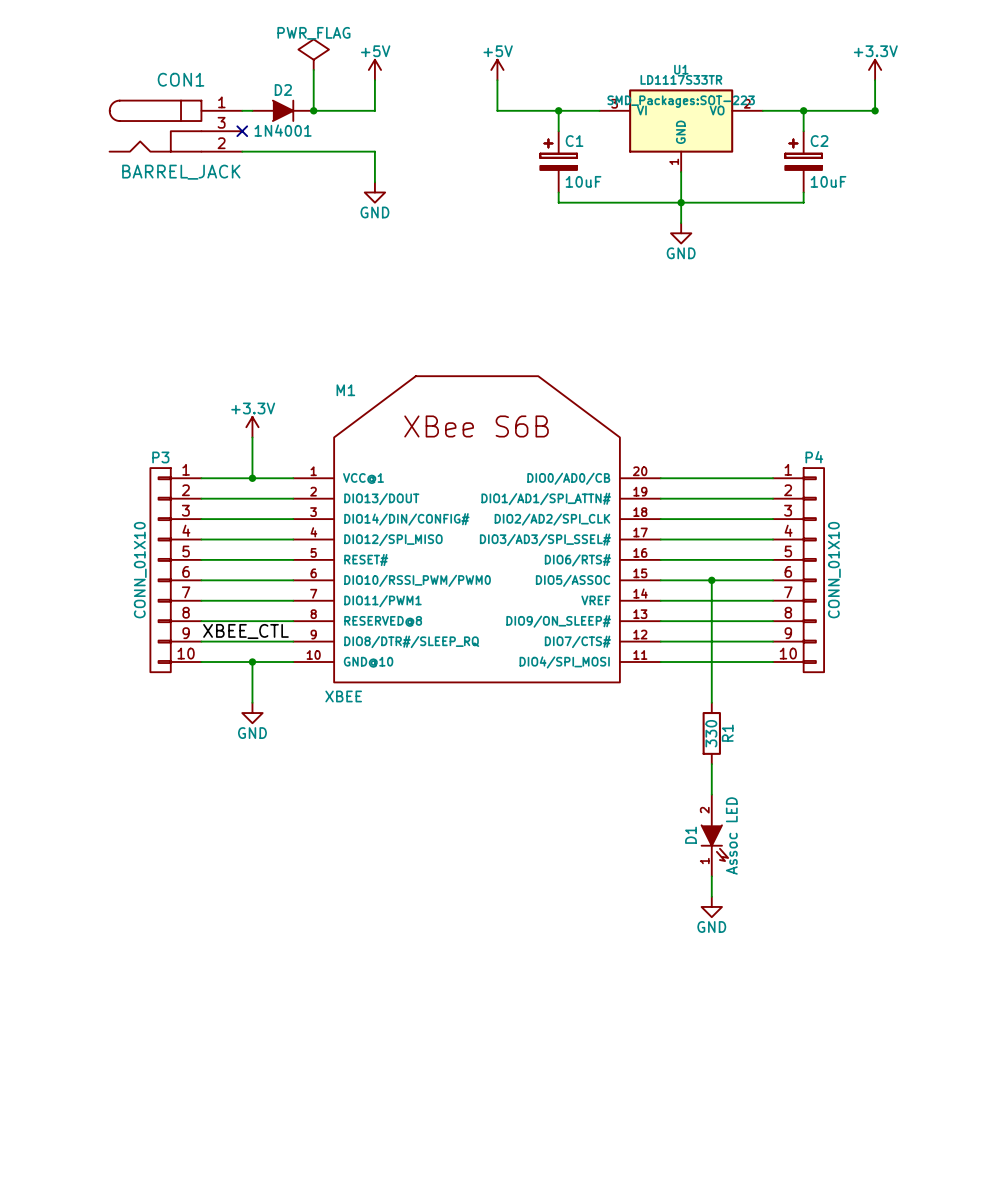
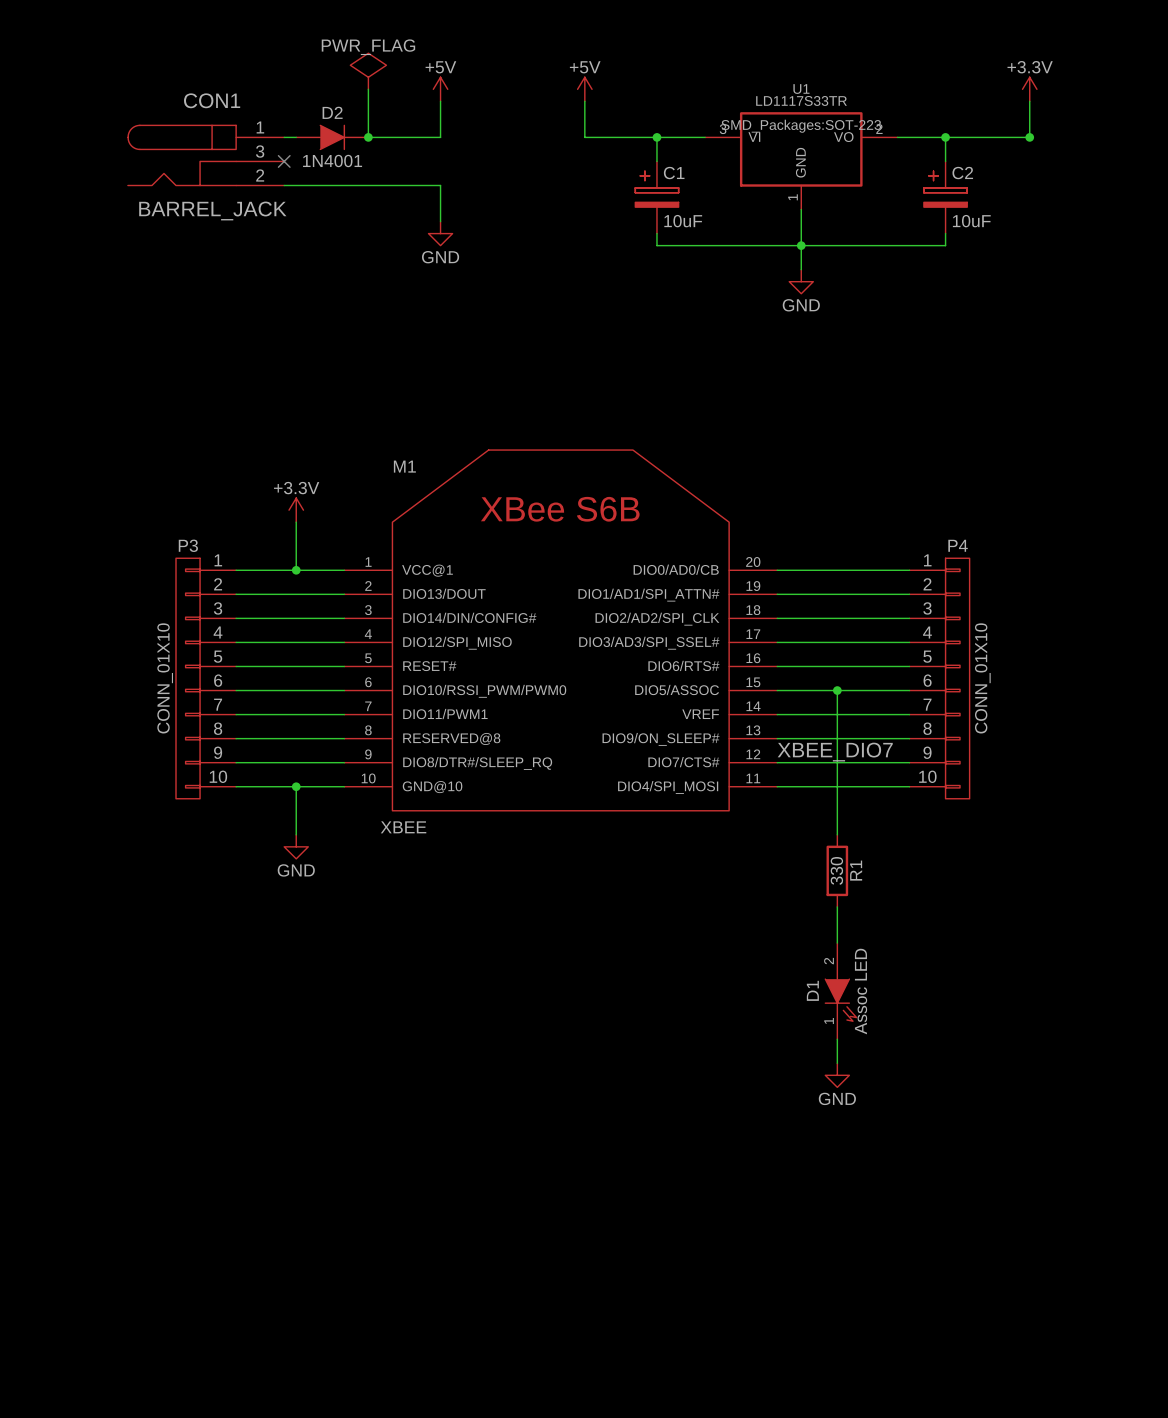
label: XBEE_CTL (245, 631) -> none
label: none -> XBEE_DIO7 (835, 752)

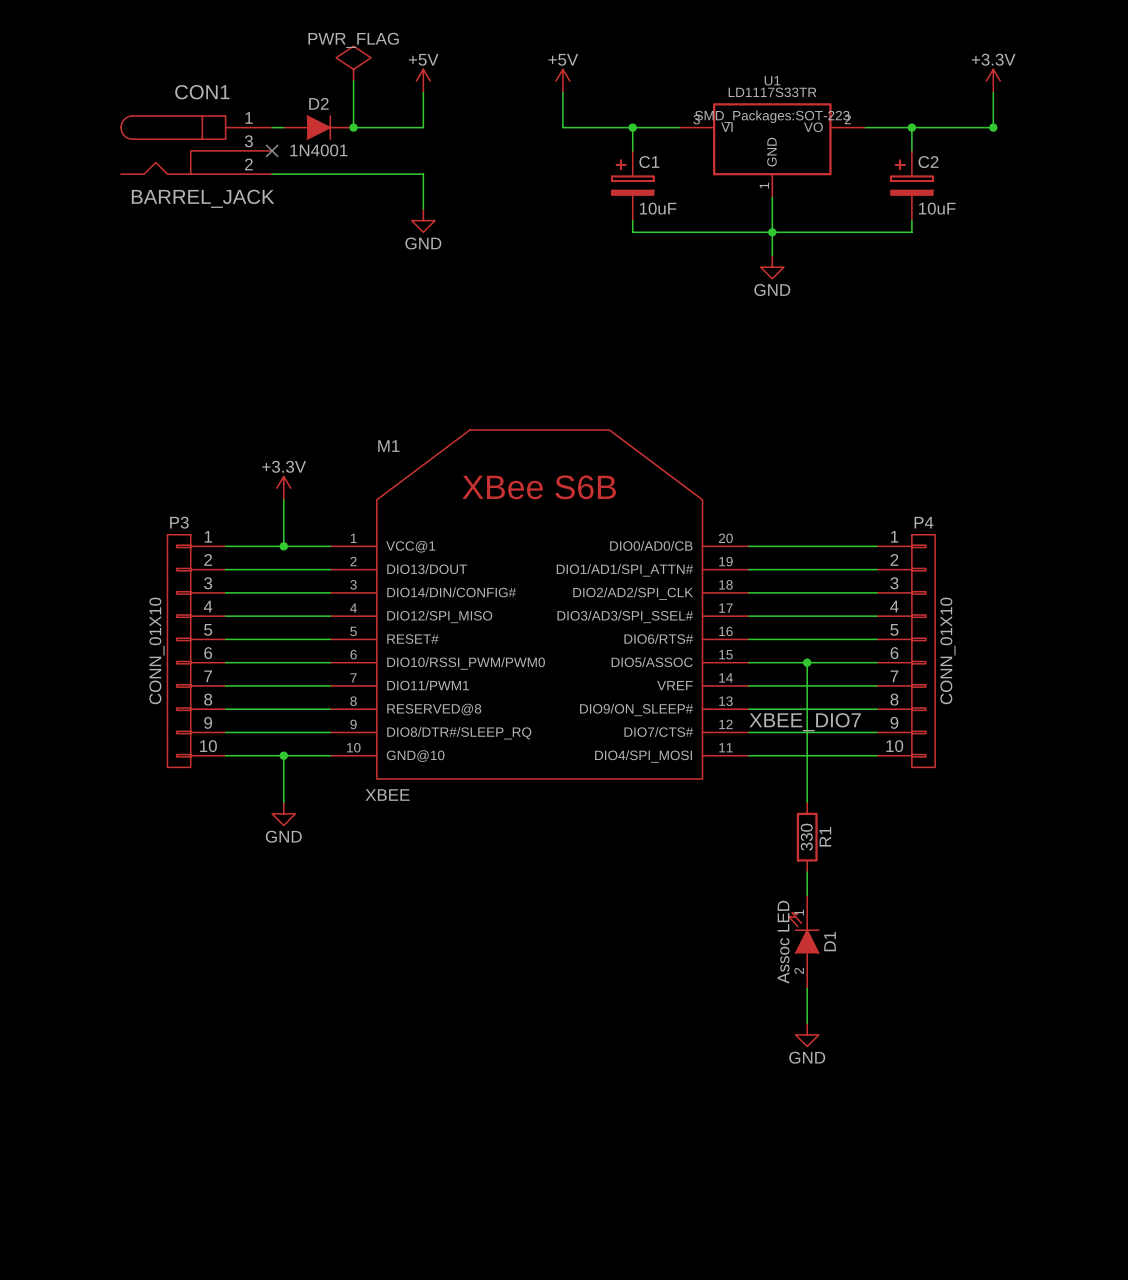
D1 rotation: 0° (840, 1000) -> 180° (803, 933)

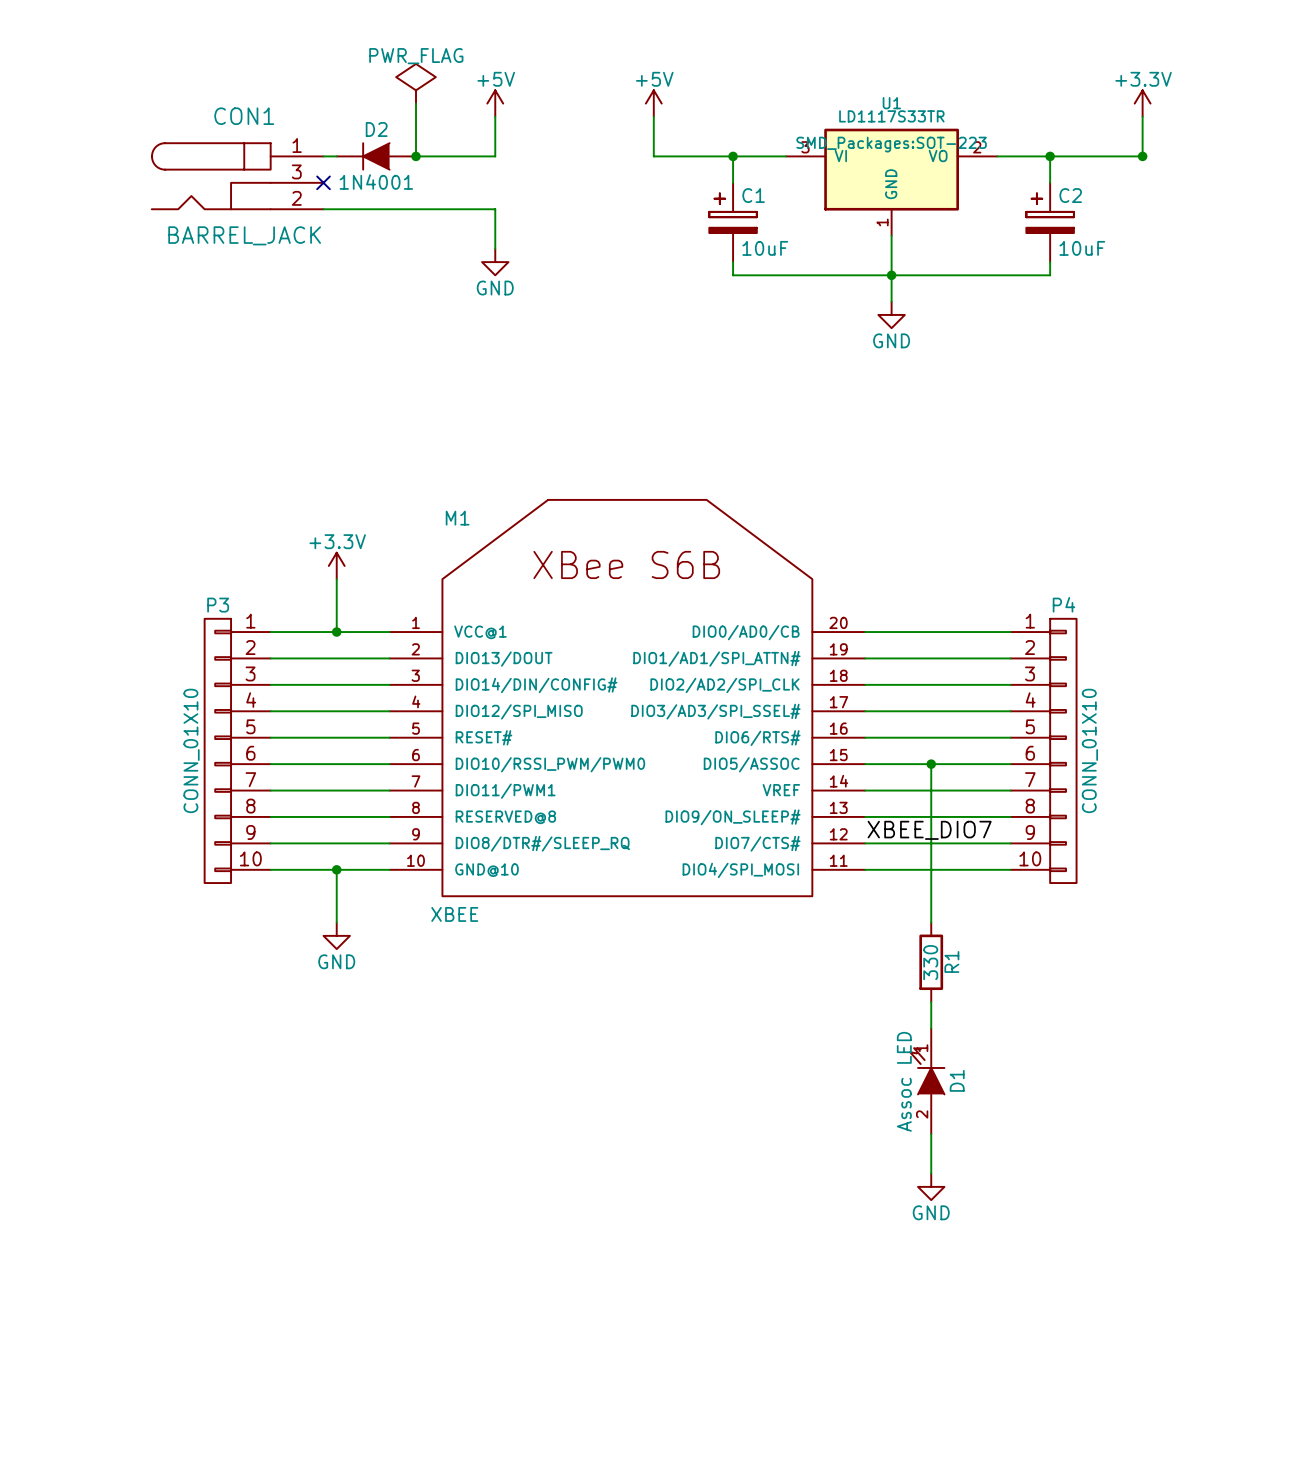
D2 rotation: 0° (319, 127) -> 180° (375, 156)

